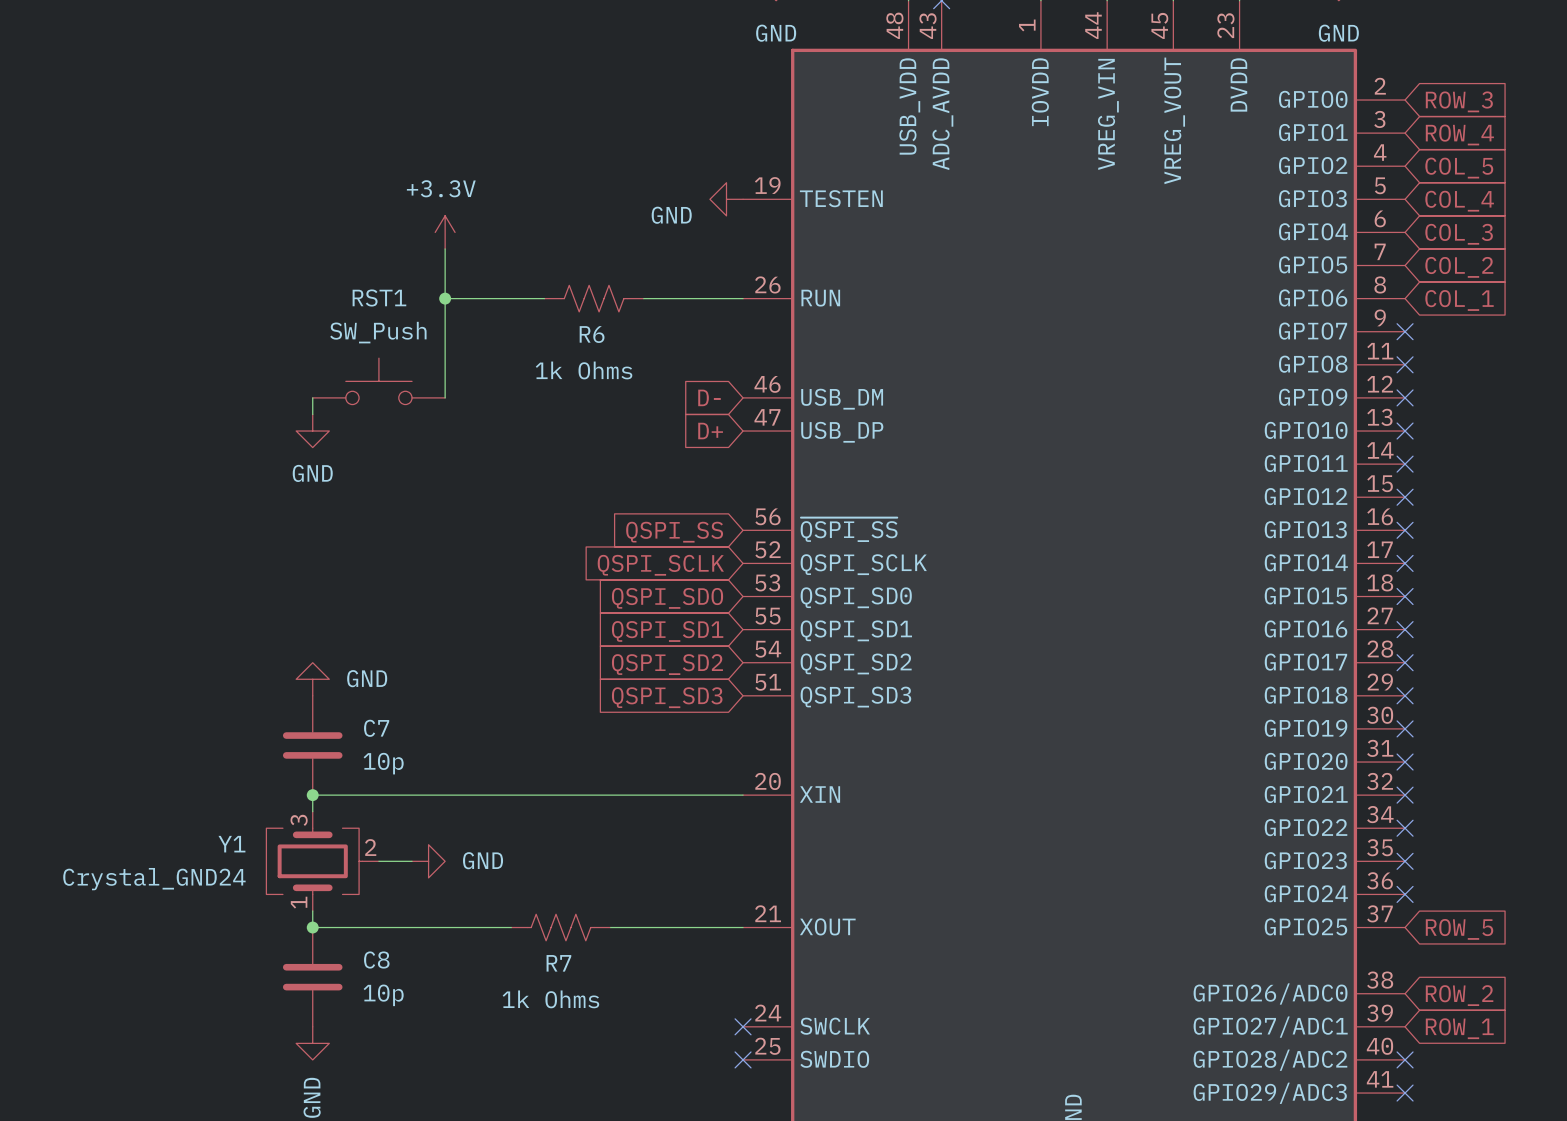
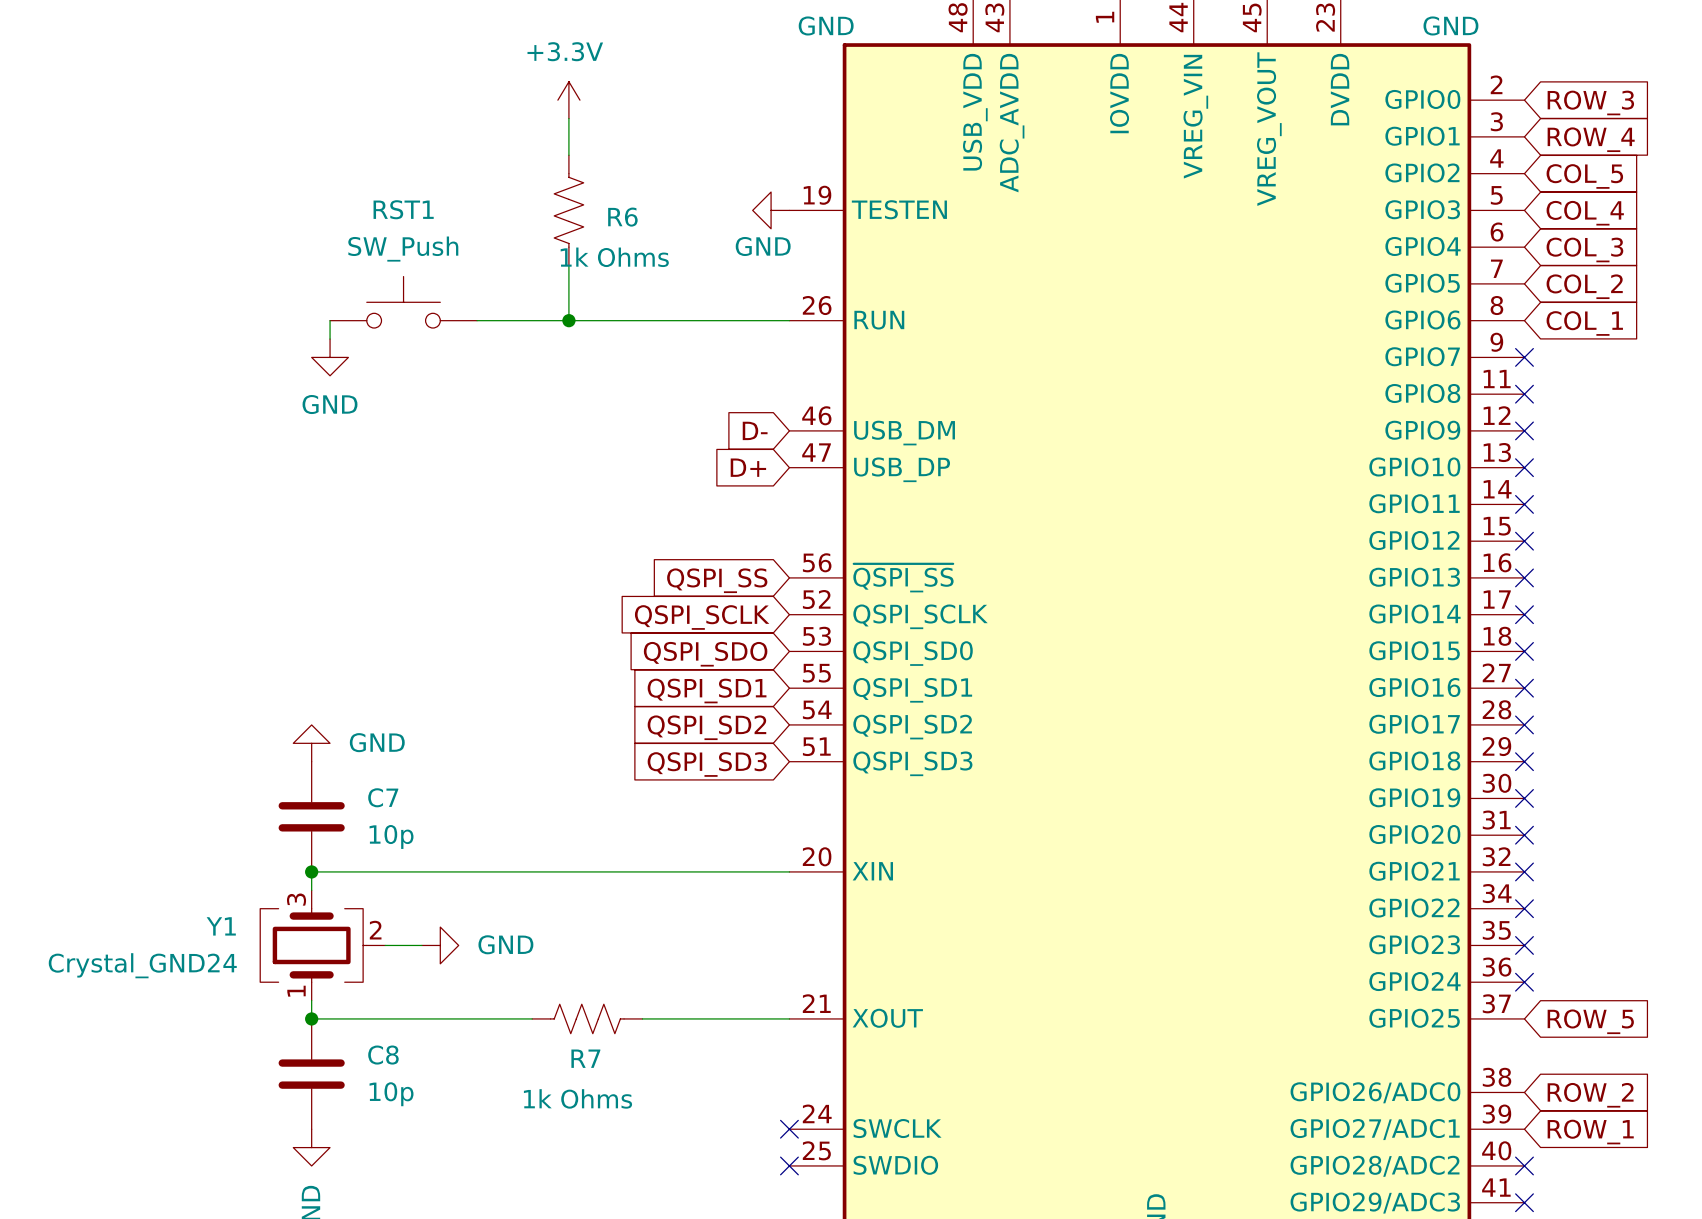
wire: none -> (568, 118) (568, 155)
power symbol text position: GND (671, 215) -> GND (763, 246)
power symbol position: +3.3V (445, 232) -> +3.3V (568, 100)
wire: (445, 248) (445, 397) -> none
wire: none -> (568, 265) (568, 320) (679, 320)
junction: (445, 298) -> none
junction: none -> (568, 320)
R6 rotation: 0° (594, 298) -> 90° clockwise (568, 210)
R6 position: (594, 298) -> (568, 210)
R6 name position: R6 (592, 334) -> R6 (622, 217)
R6 value position: 1k Ohms (584, 370) -> 1k Ohms (614, 257)
RST1 position: (378, 381) -> (403, 302)
wire: (312, 397) (312, 414) -> (330, 320) (330, 339)
power symbol position: GND (312, 431) -> GND (330, 357)

